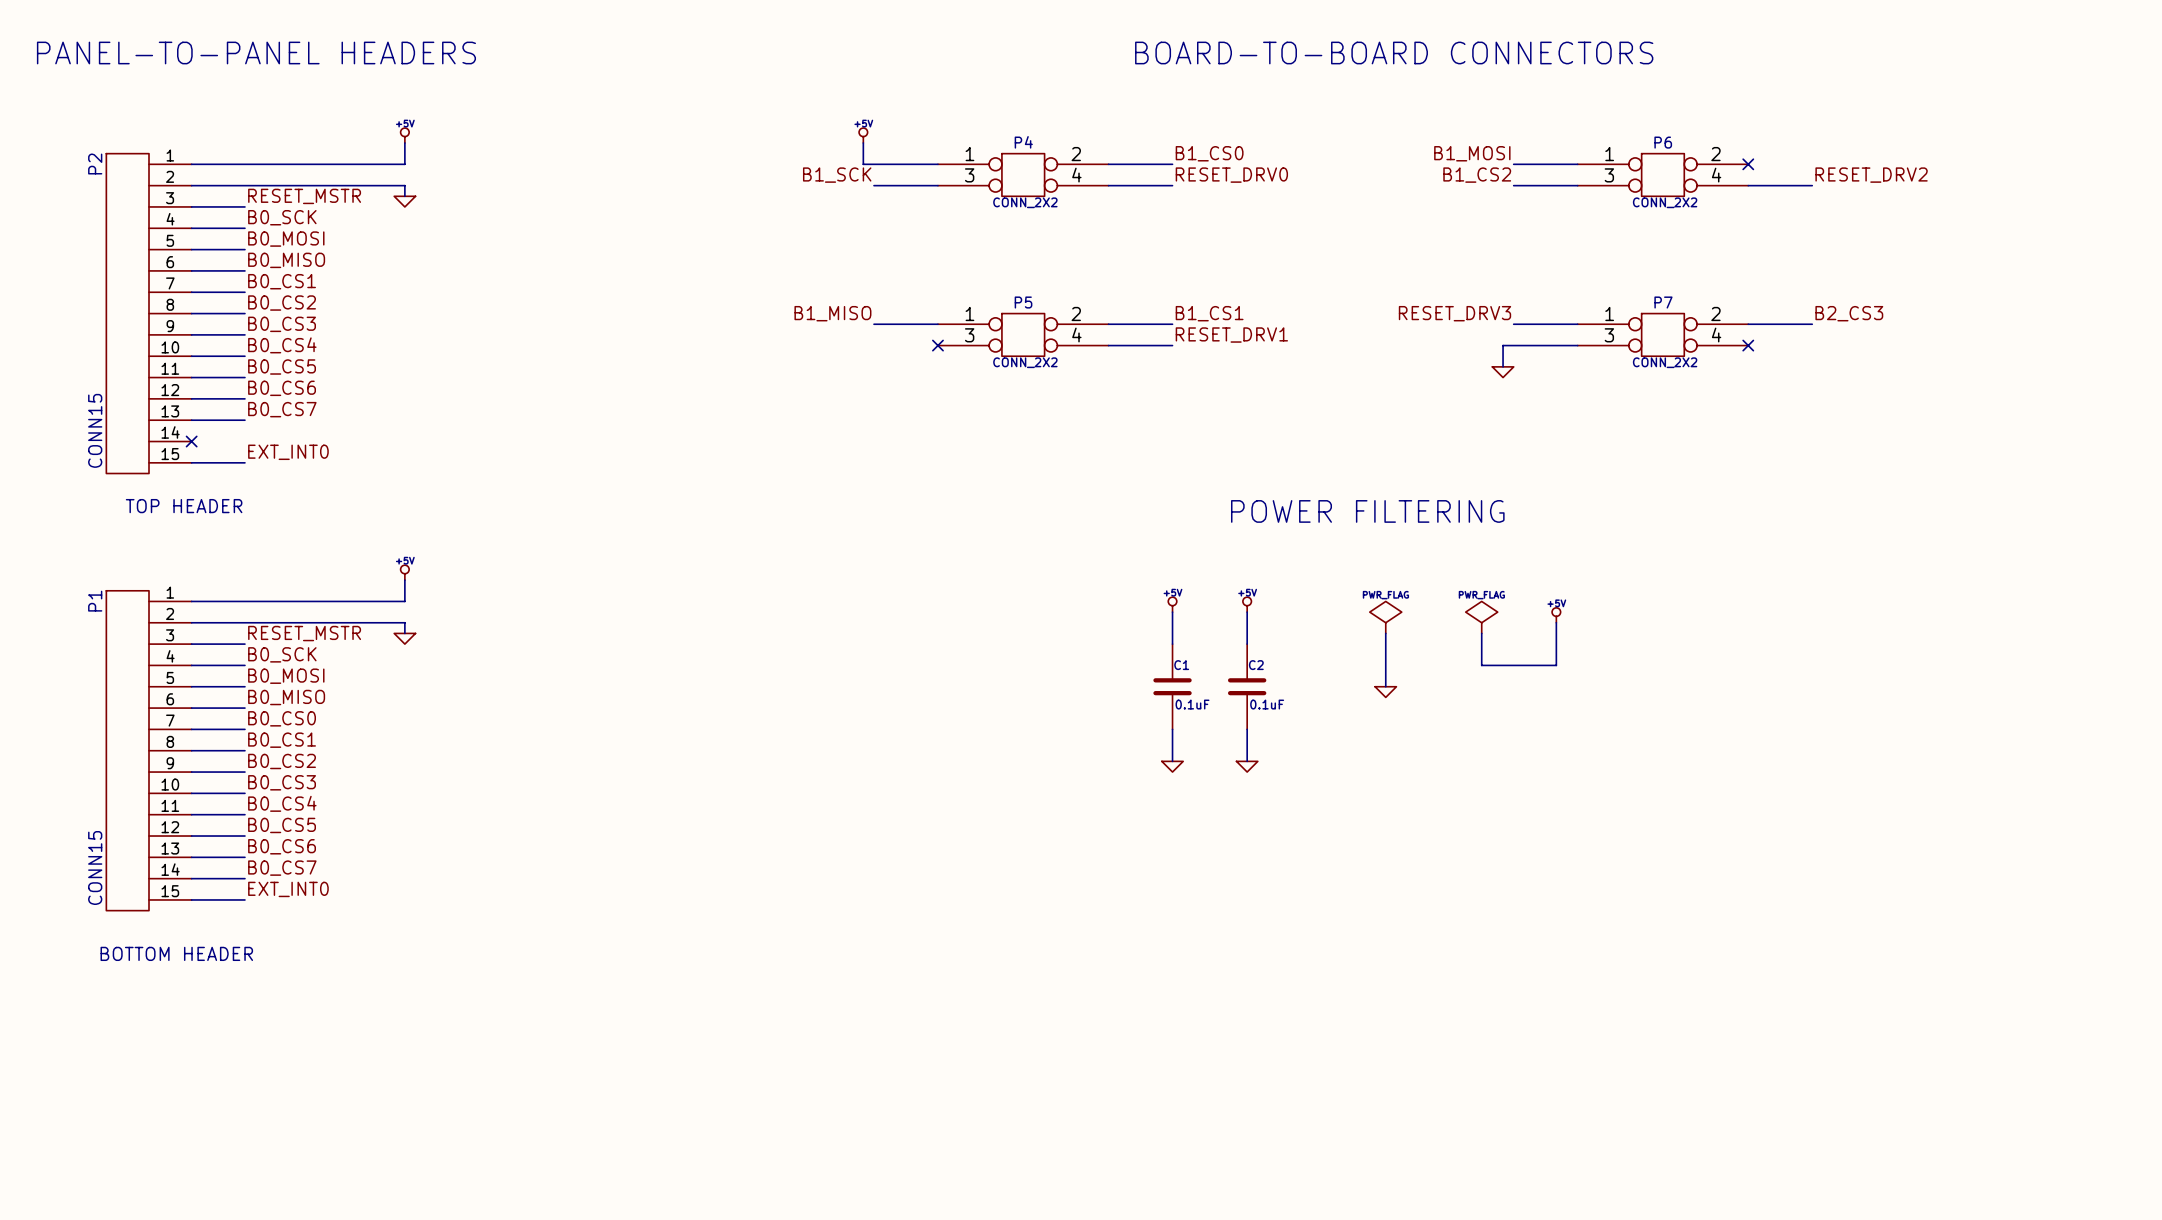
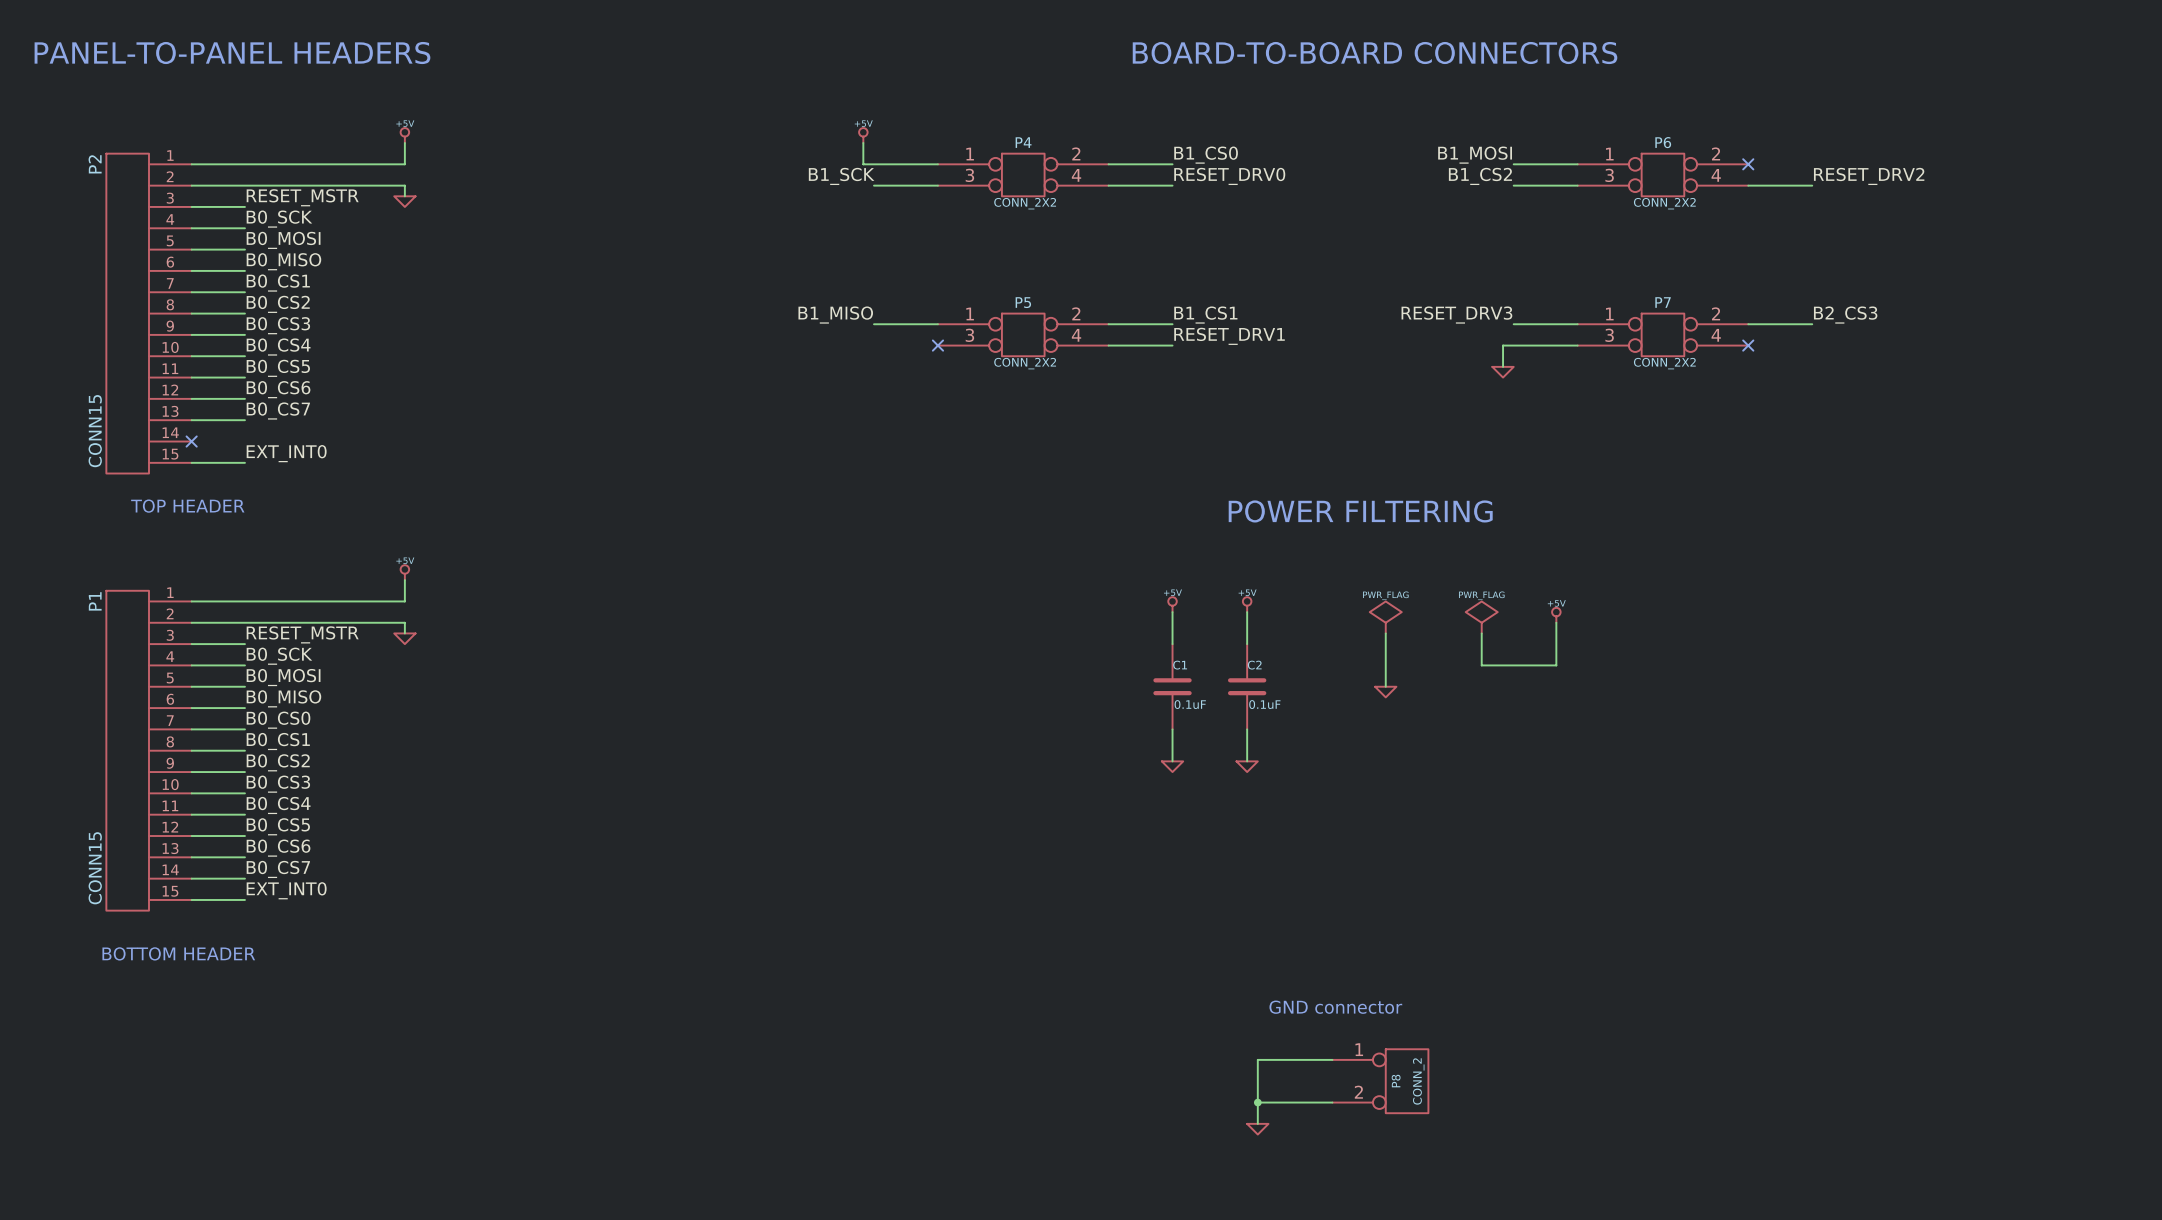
text: none -> GND connector (1335, 1007)
wire: none -> (1332, 1059) (1257, 1059) (1257, 1123)
P8: none -> CONN_2 (1380, 1081)
wire: none -> (1257, 1102) (1332, 1102)
junction: none -> (1257, 1102)
power symbol: none -> (1257, 1129)

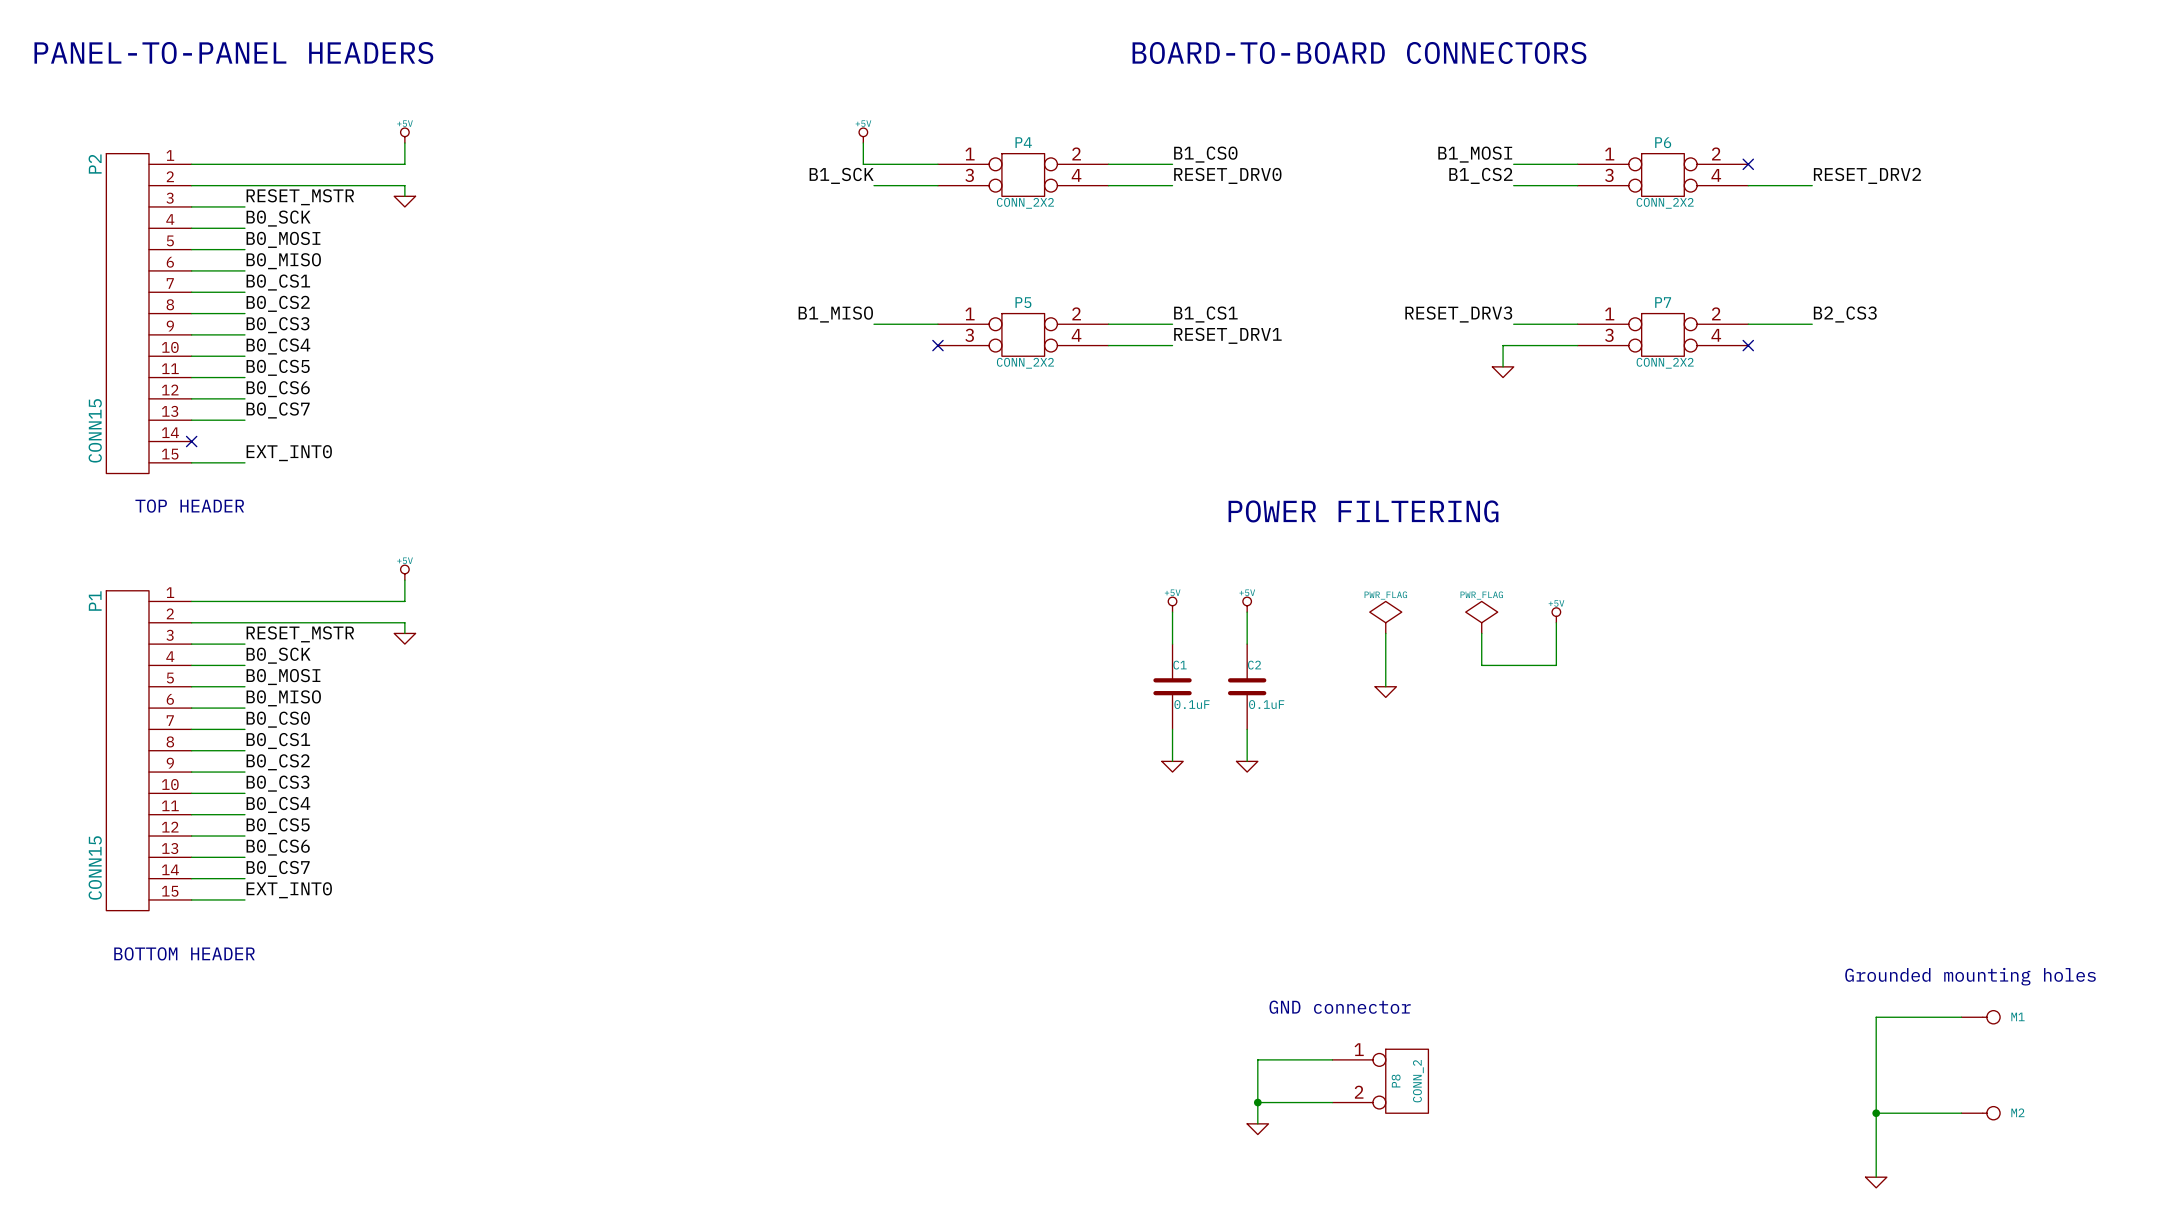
text: none -> Grounded mounting holes (1970, 976)
wire: none -> (1961, 1017) (1876, 1017) (1876, 1177)
M1: none -> (1980, 1017)
wire: none -> (1876, 1113) (1961, 1113)
junction: none -> (1876, 1113)
M2: none -> (1980, 1113)
power symbol: none -> (1876, 1182)

